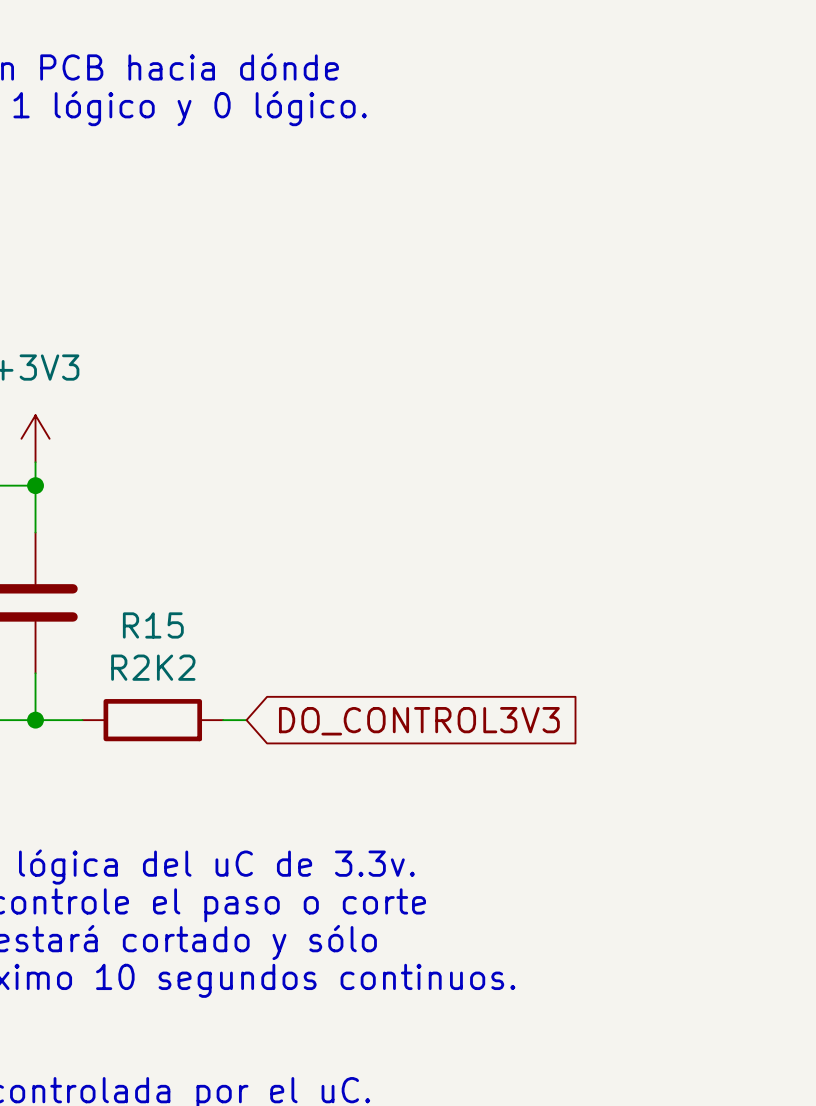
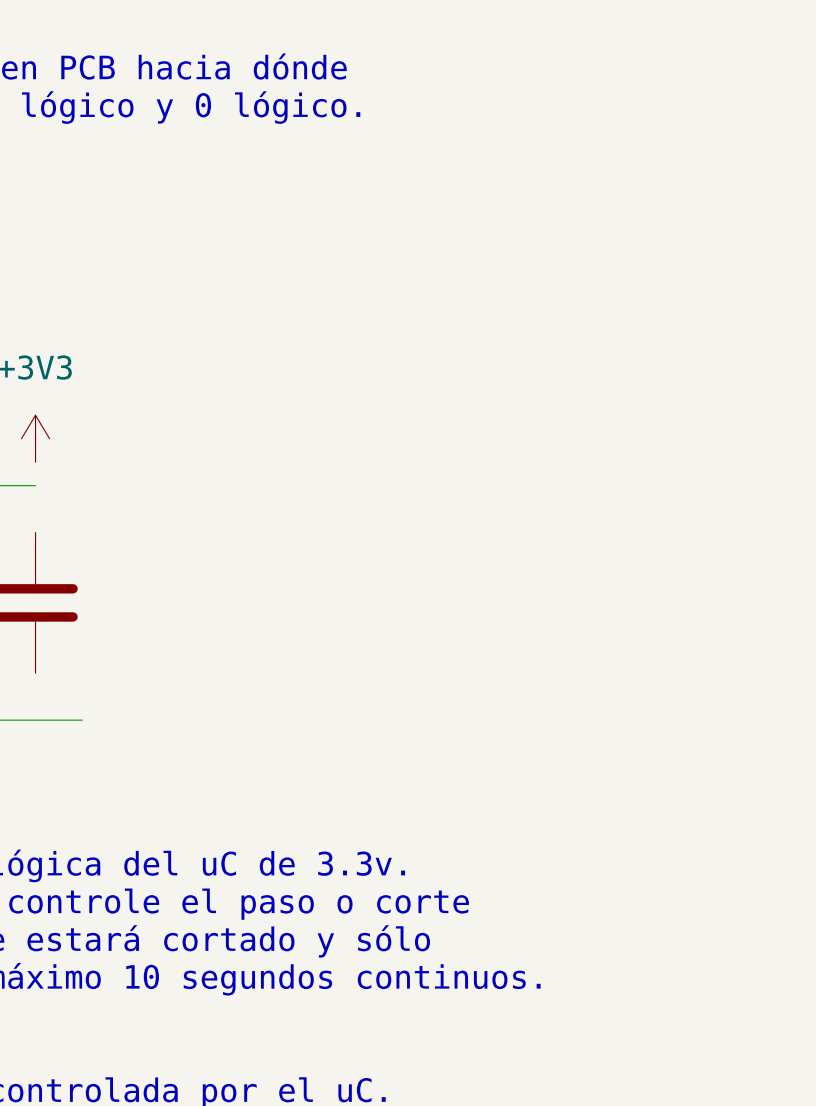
wire: (35, 462) (35, 532) -> none
junction: (35, 485) -> none
wire: (35, 673) (35, 720) -> none
junction: (35, 720) -> none
R15: R2K2 (152, 720) -> none
wire: (223, 720) (246, 720) -> none
global label: DO_CONTROL3V3 (419, 721) -> none

